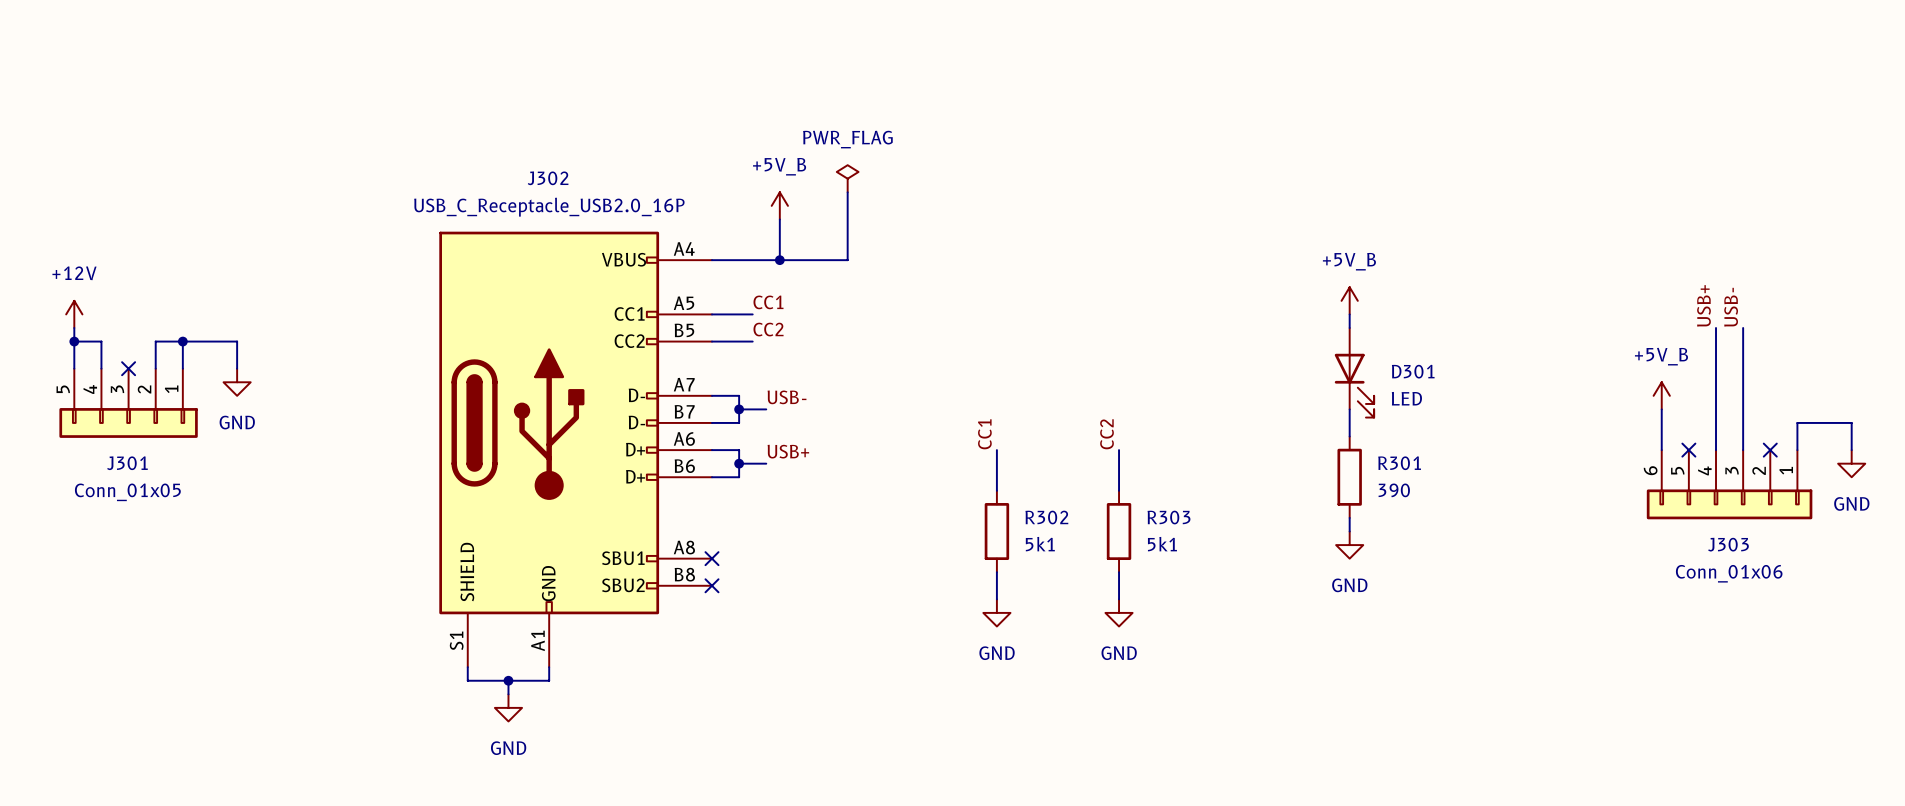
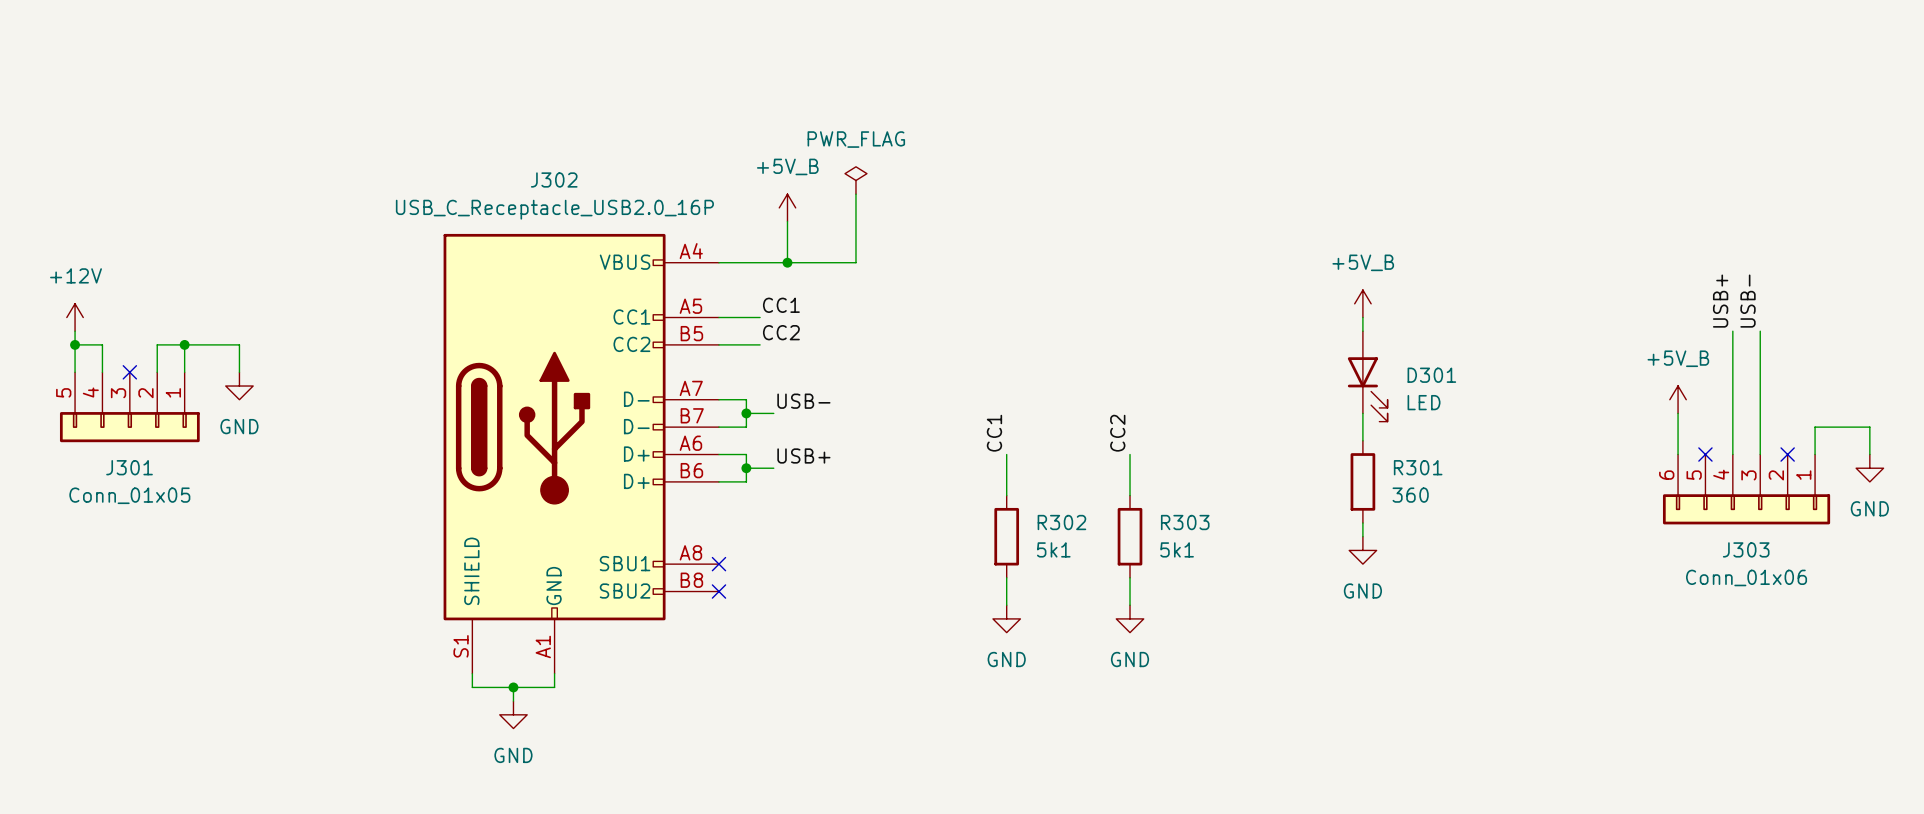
R301 value: 390 (1394, 490) -> 360 (1410, 495)

